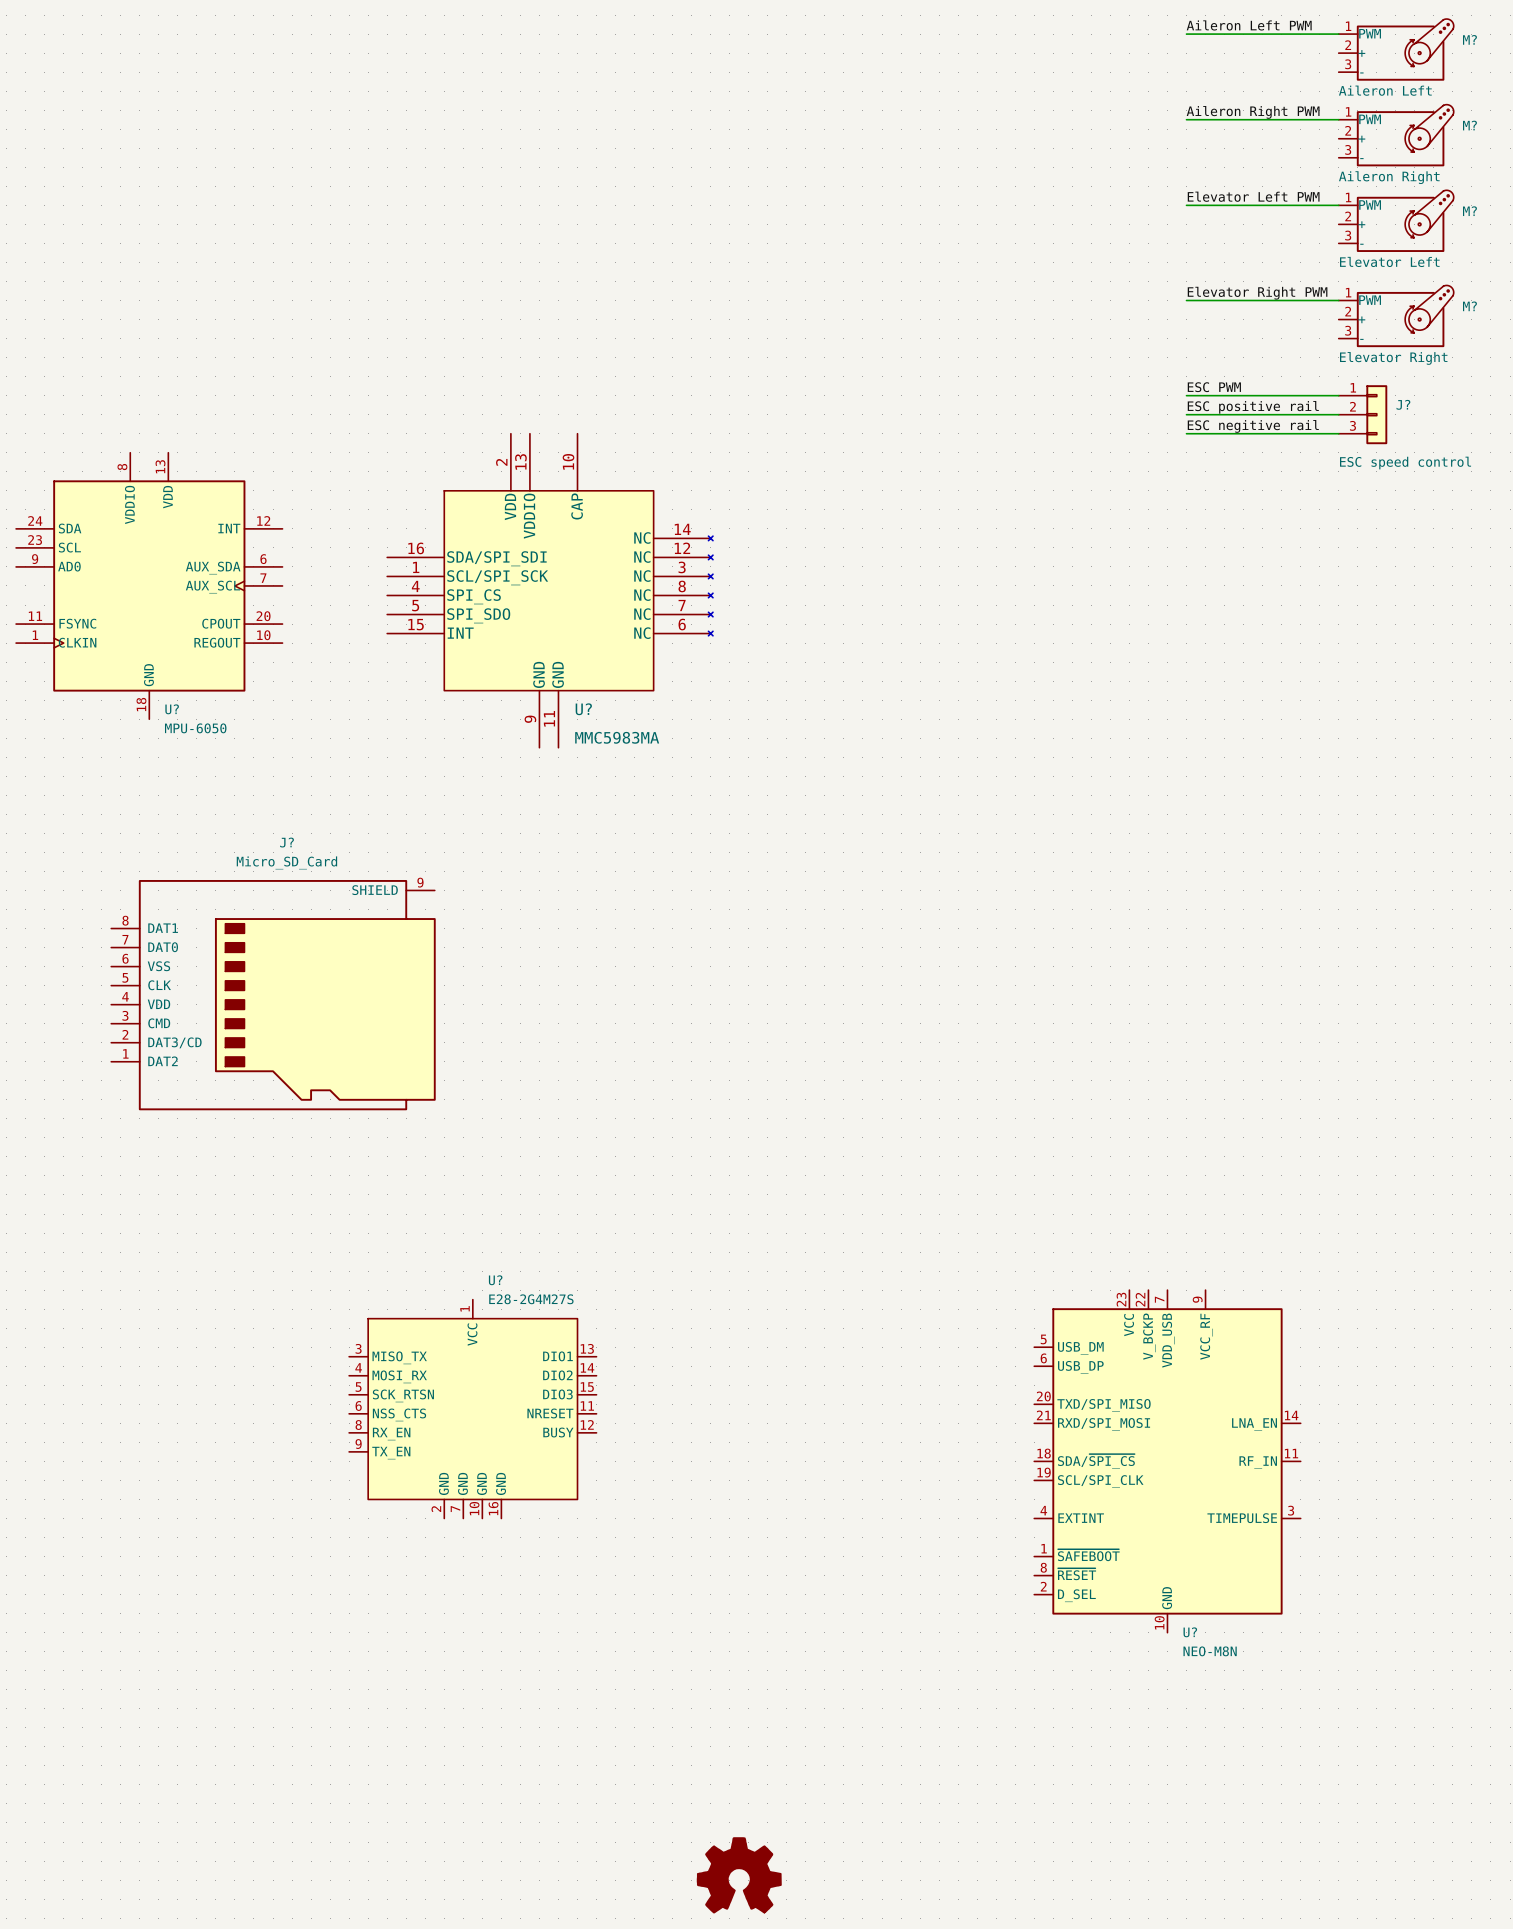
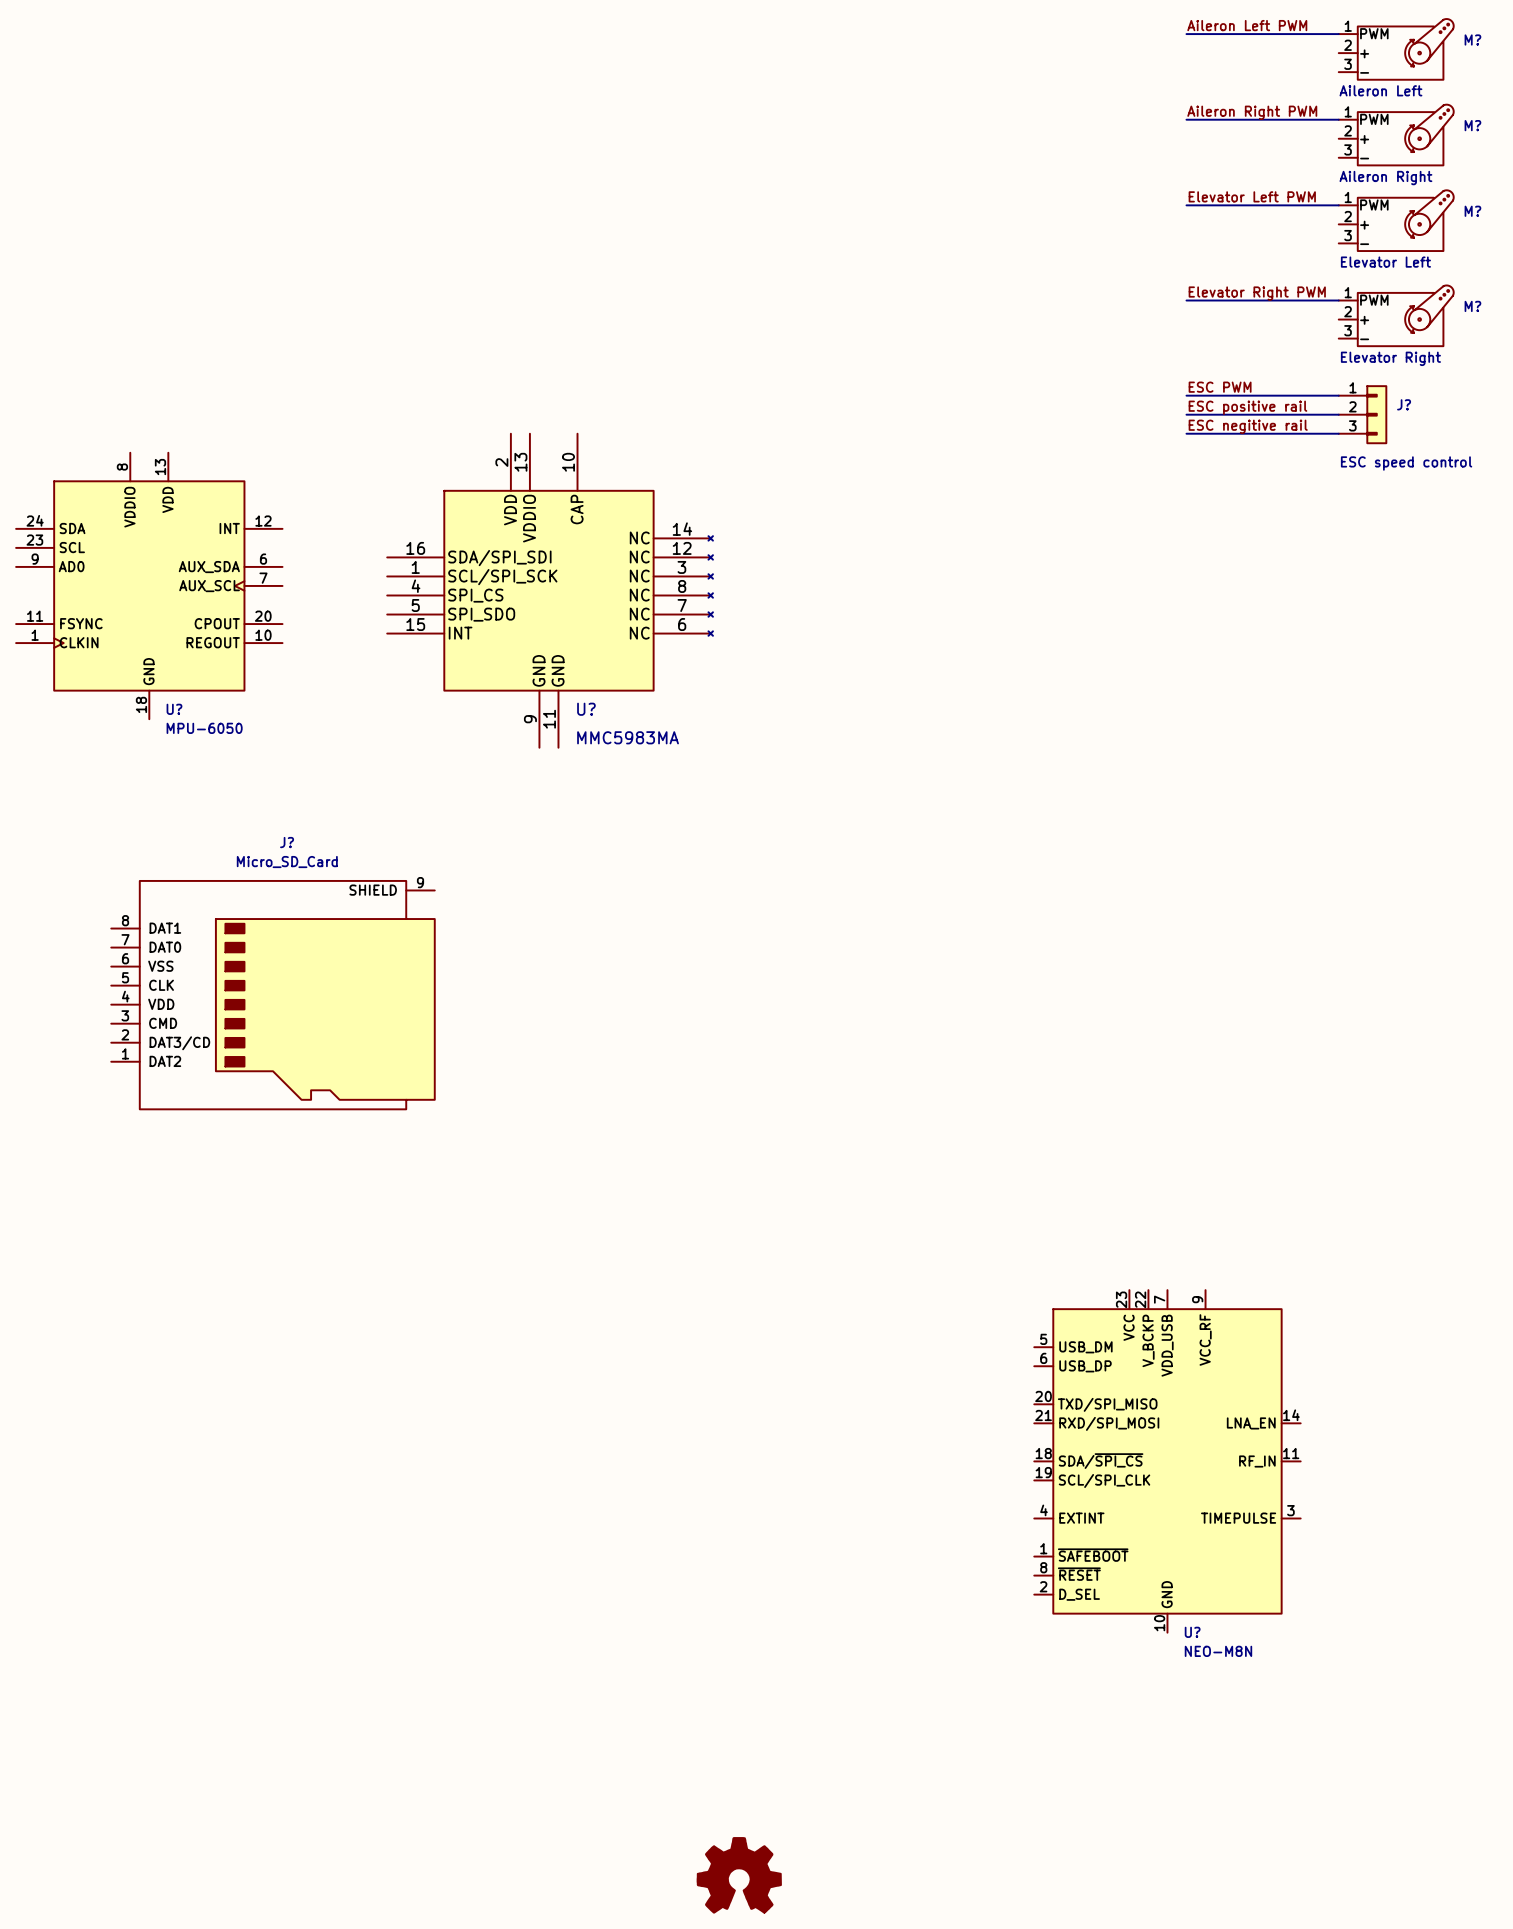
U?: E28-2G4M27S (472, 1409) -> none

